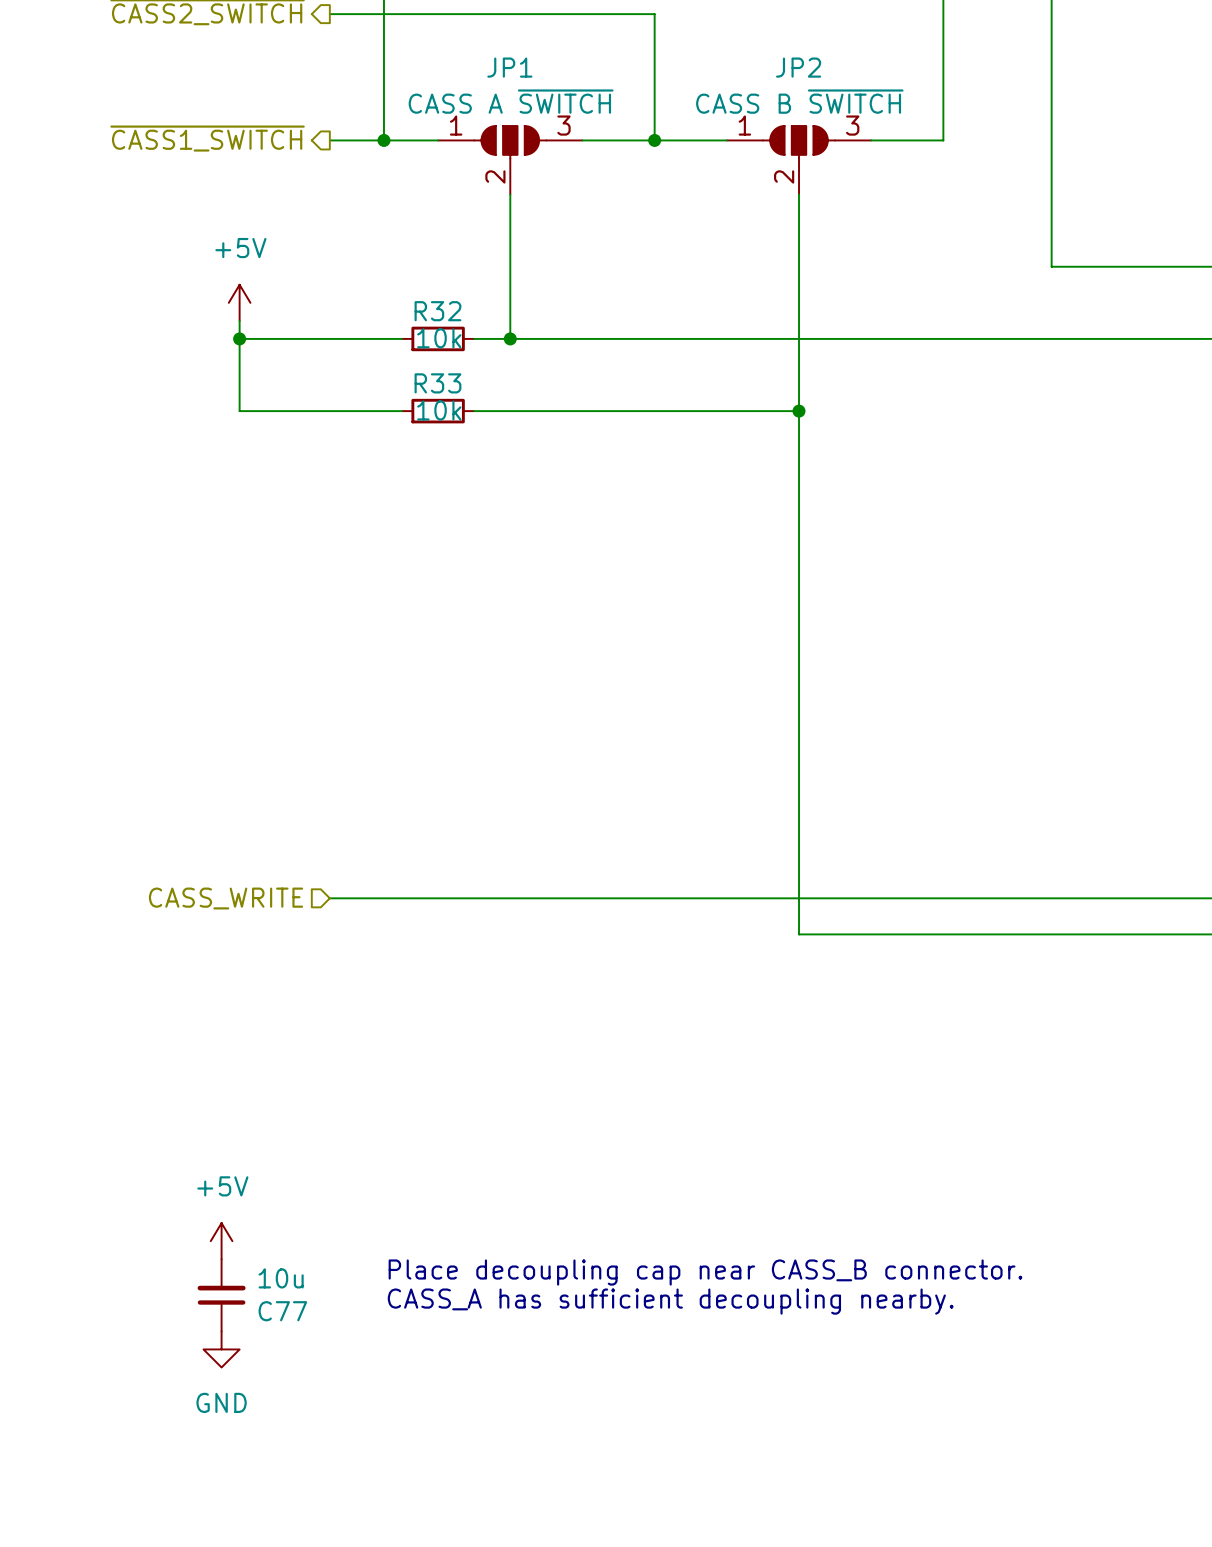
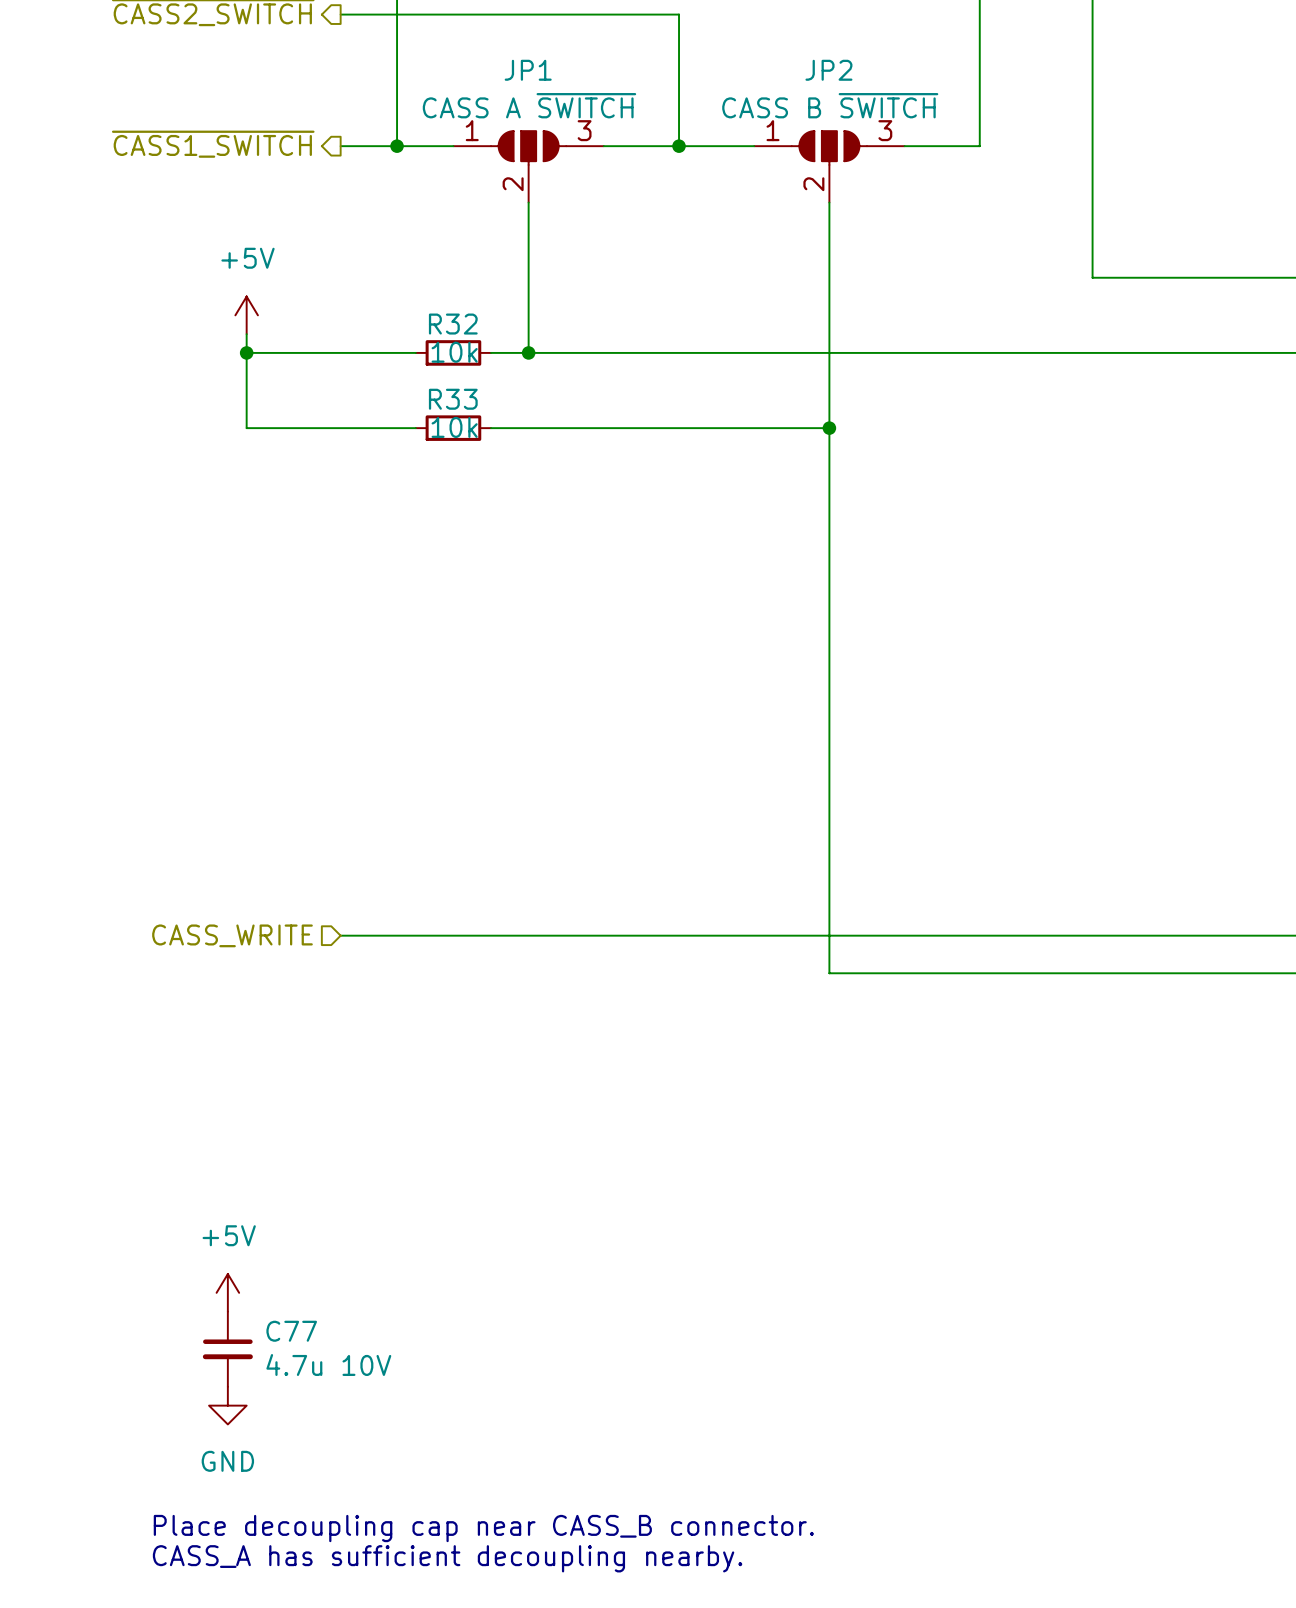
text position: Place decoupling cap near CASS_B connector. (705, 1272) -> Place decoupling cap near CASS_B connector. (483, 1528)
C77 value: 10u (281, 1278) -> 4.7u 10V (328, 1365)
C77 rotation: 0° (221, 1295) -> 180° (227, 1349)
text position: CASS_A has sufficient decoupling nearby. (670, 1301) -> CASS_A has sufficient decoupling nearby. (447, 1558)
C77 name position: C77 (282, 1311) -> C77 (291, 1331)

